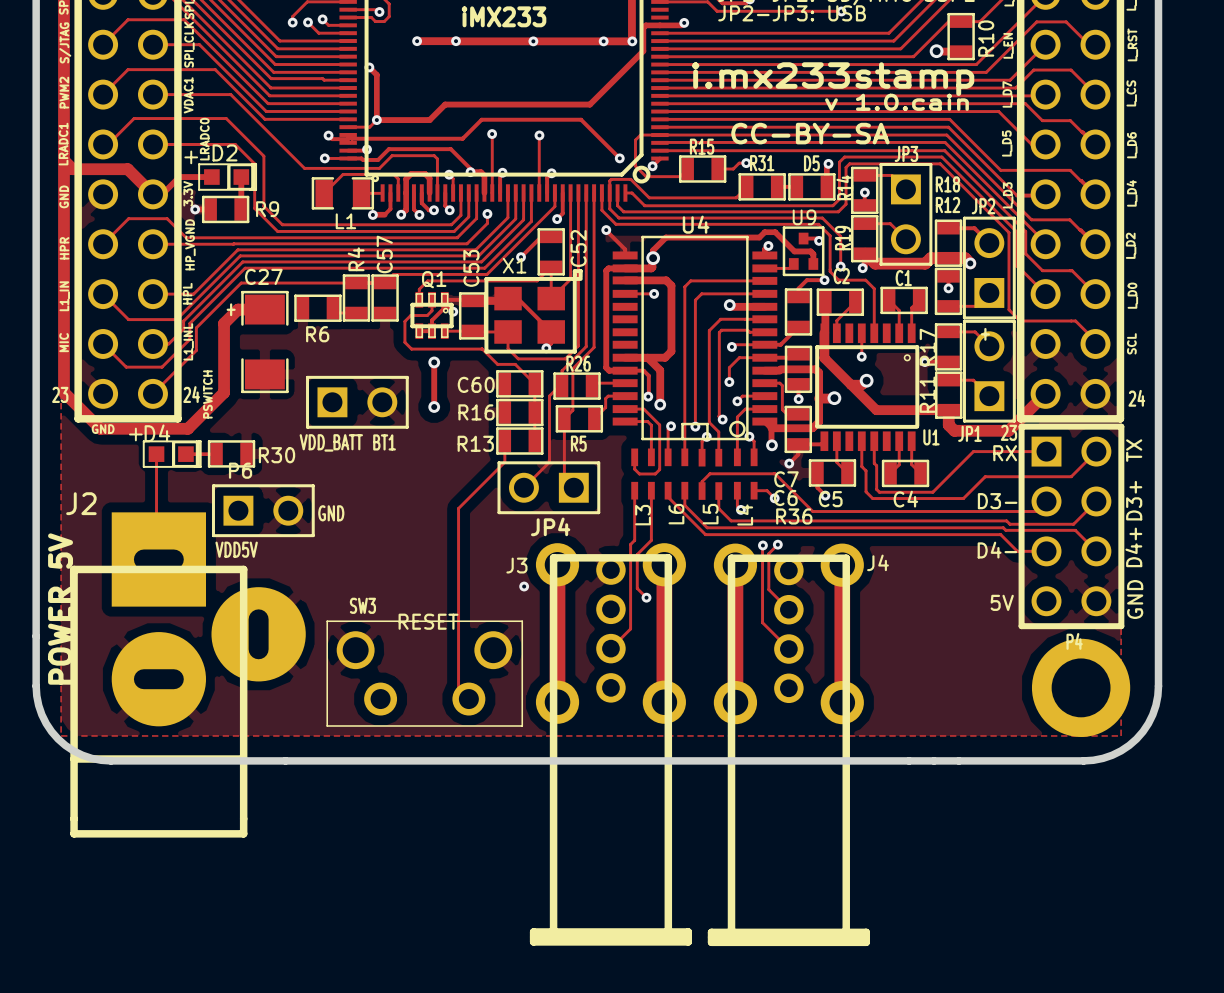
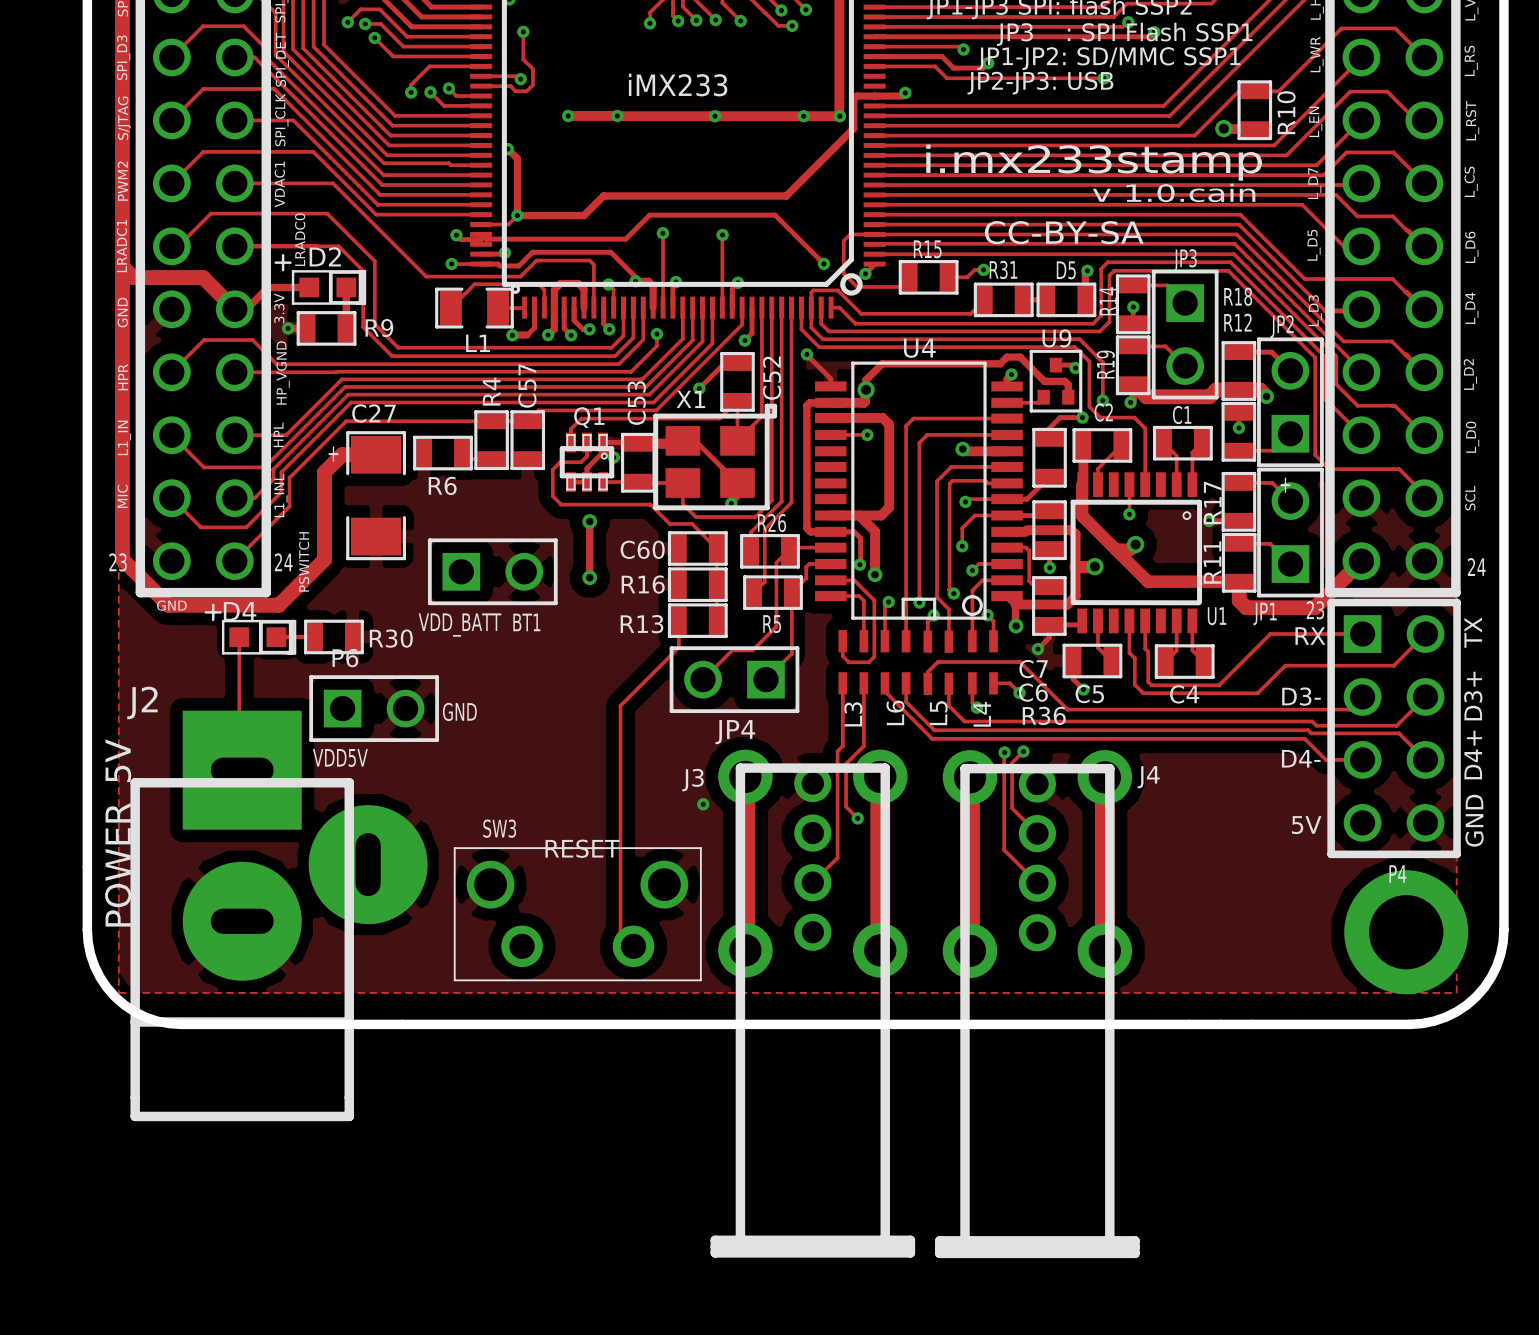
track: (562, 386) (559, 386) (549, 396) (549, 462) (547, 464) -> (788, 551) (776, 562) (776, 626) (752, 650) (732, 650)
track: (564, 418) (564, 478) (573, 487) -> (791, 592) (791, 653) (765, 679)

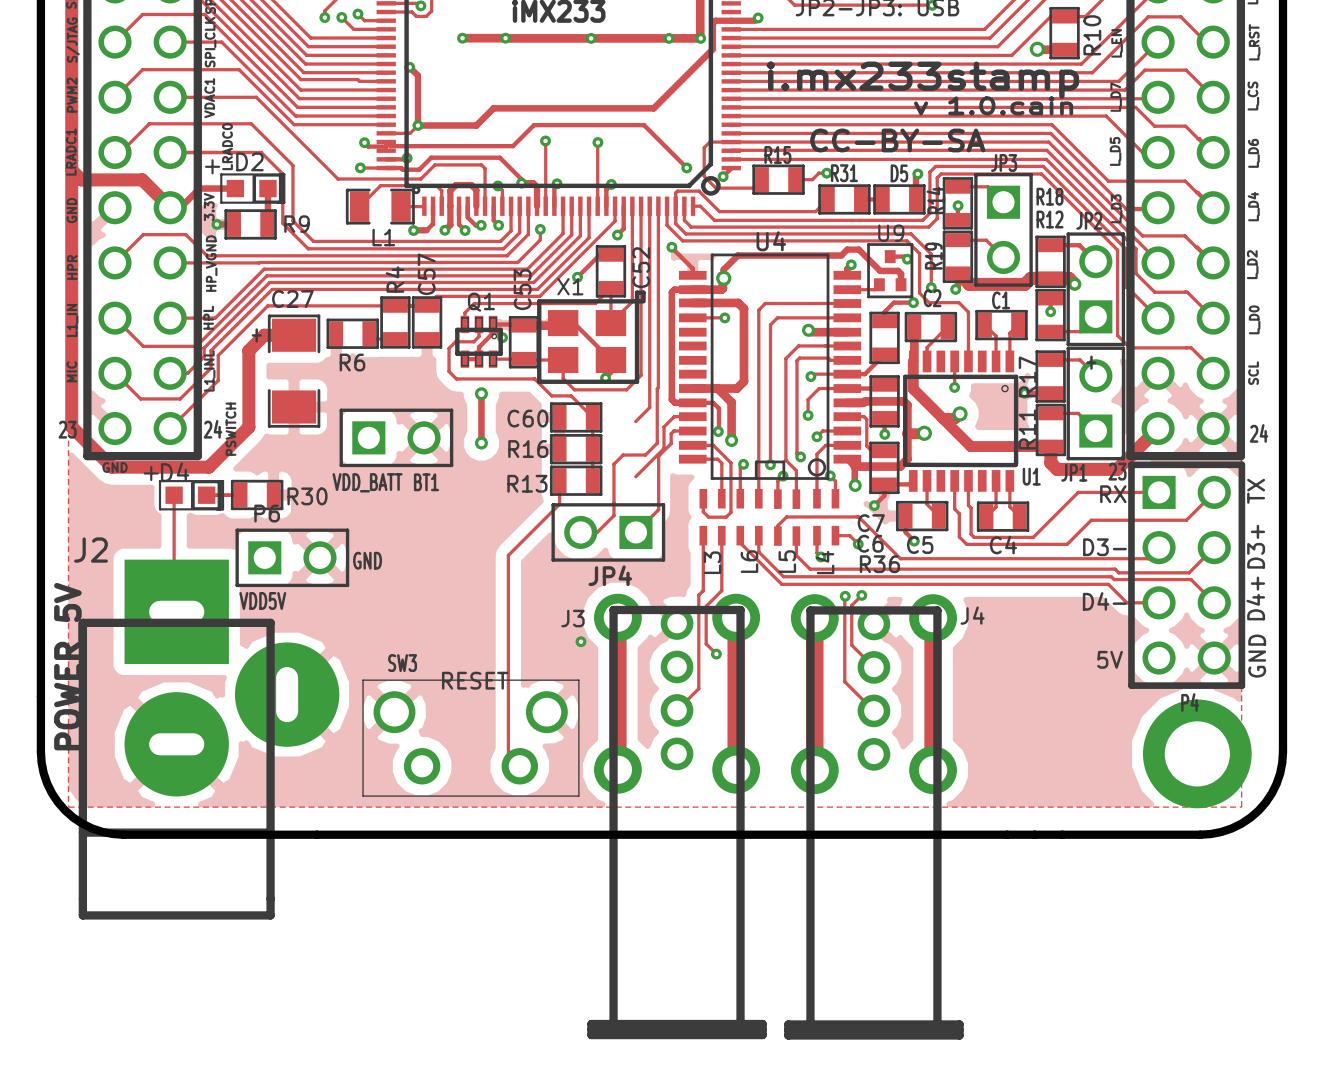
track: (781, 501) (751, 532) (751, 551) -> (649, 376) (649, 407) (635, 421)
track: (791, 502) (764, 529) (764, 581) (754, 592) -> none
track: (809, 547) (792, 547) (776, 562) (776, 626) (752, 650) (732, 650) (703, 679) -> (658, 377) (657, 443) (645, 455) (623, 455) (613, 464) (613, 515) (597, 532) (580, 532)
track: none -> (674, 416) (664, 426) (664, 448) (635, 476)
R26: (770, 551) -> none
R5: (772, 592) -> none

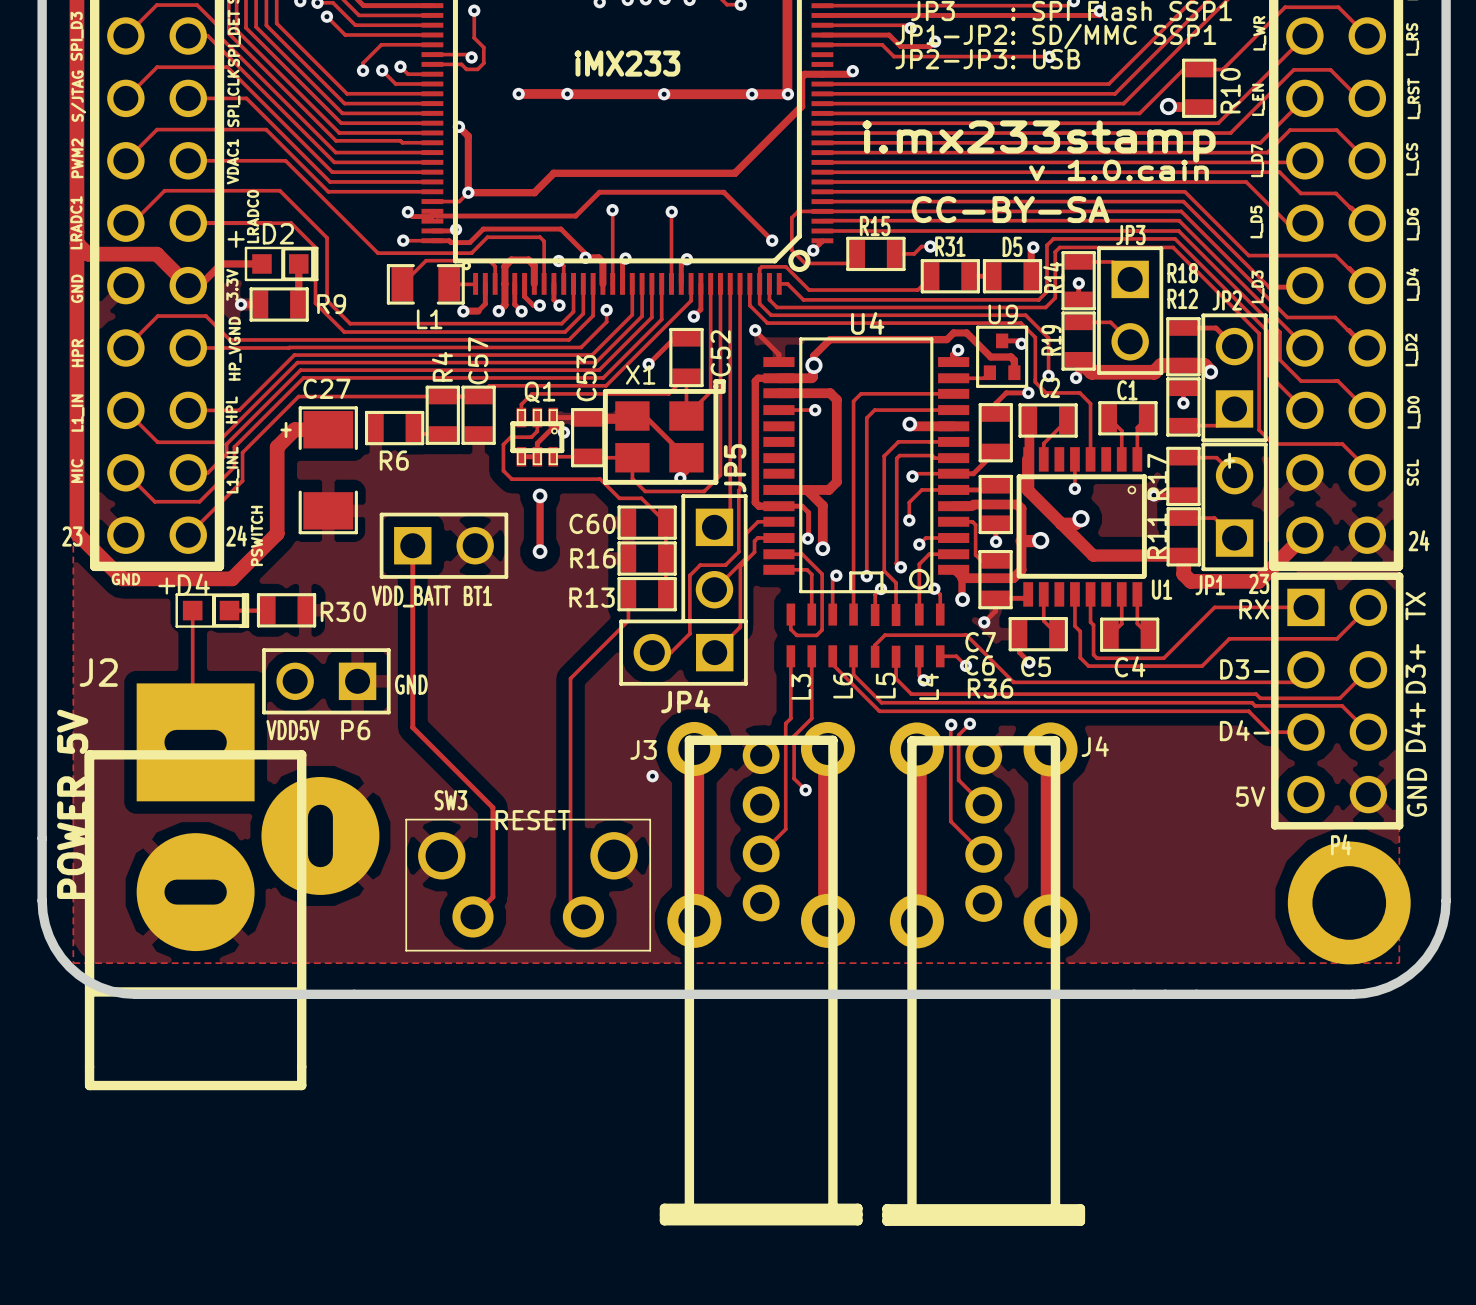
track: none -> (412, 545) (412, 727) (492, 807) (492, 897) (473, 916)
JP5: none -> (714, 558)
P6 rotation: 0° (292, 557) -> 180° (326, 681)

